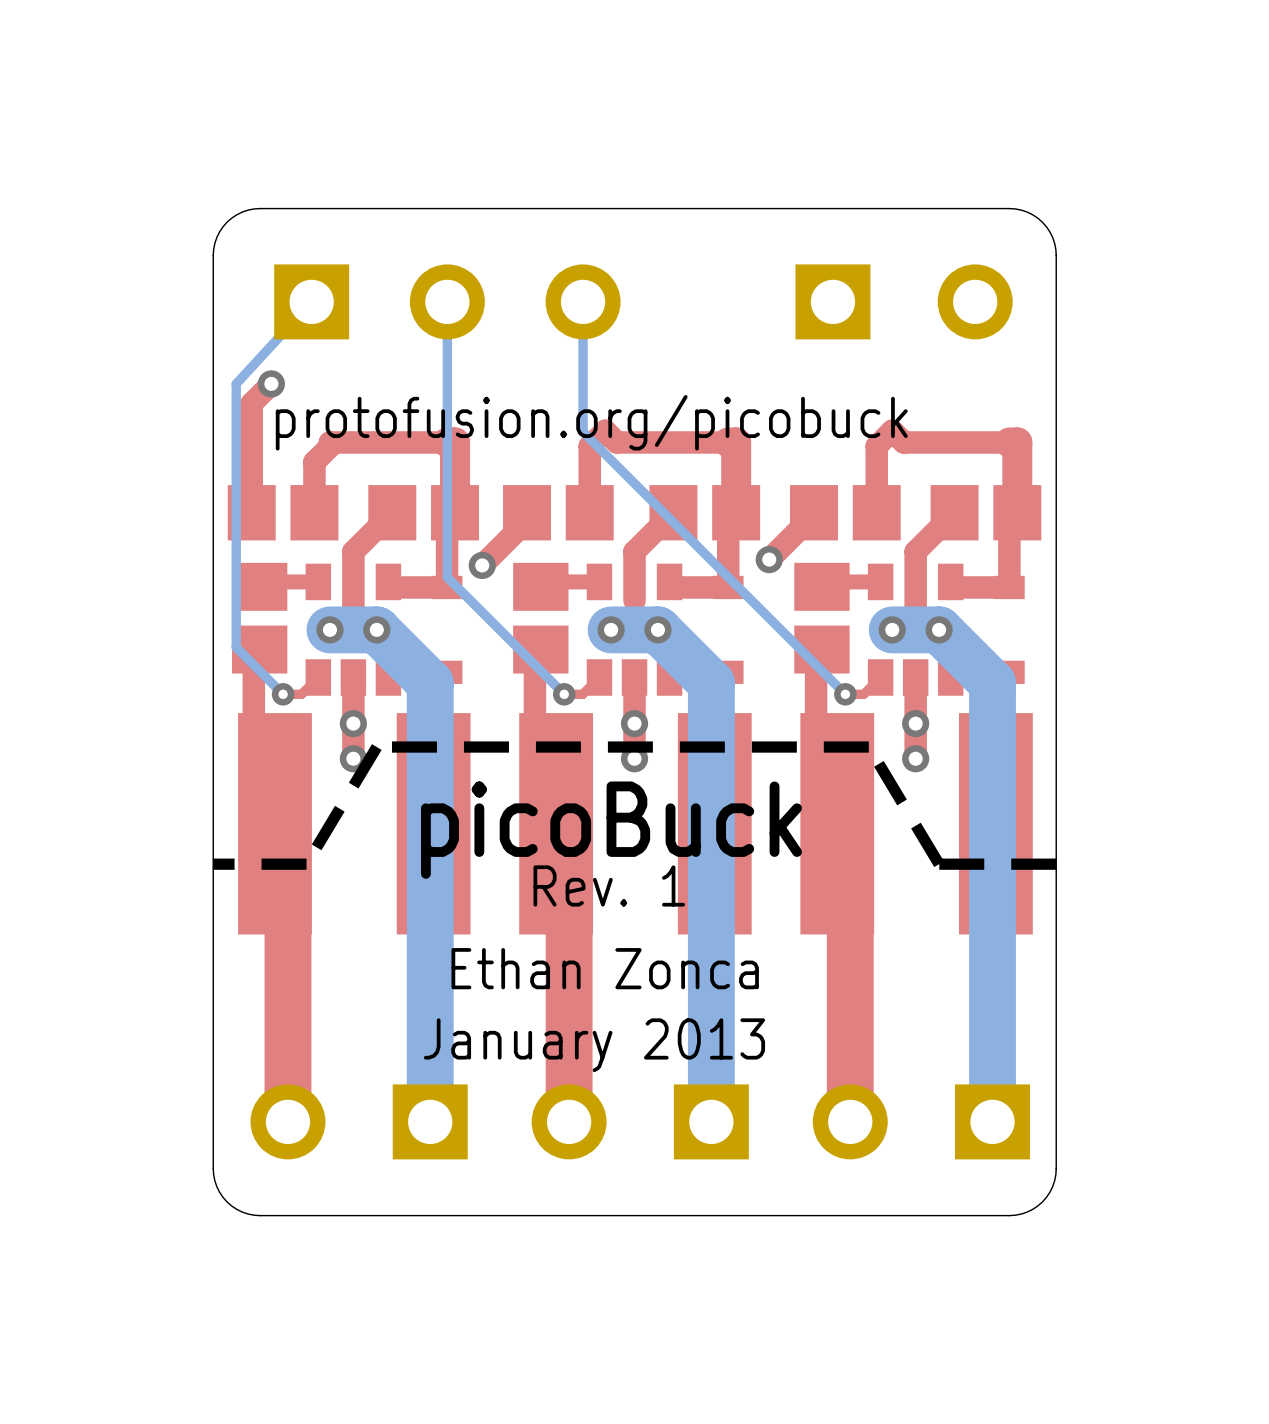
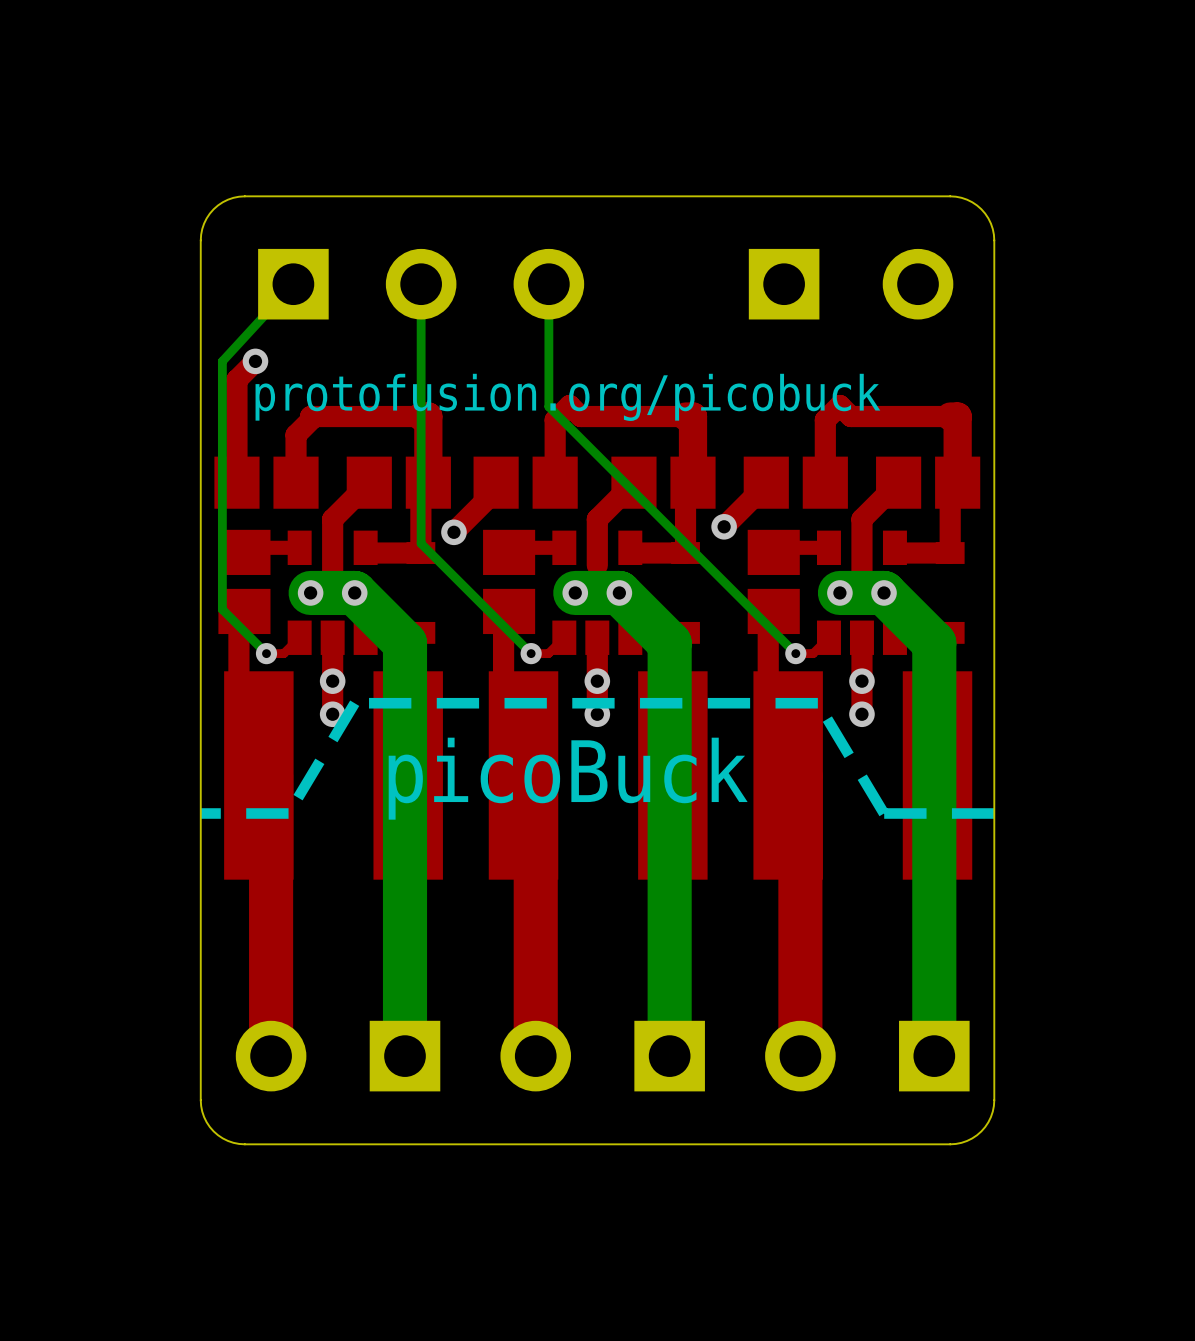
text: Rev. 1 (609, 885) -> none
text: Ethan Zonca (605, 968) -> none
text: January 2013 (594, 1045) -> none

